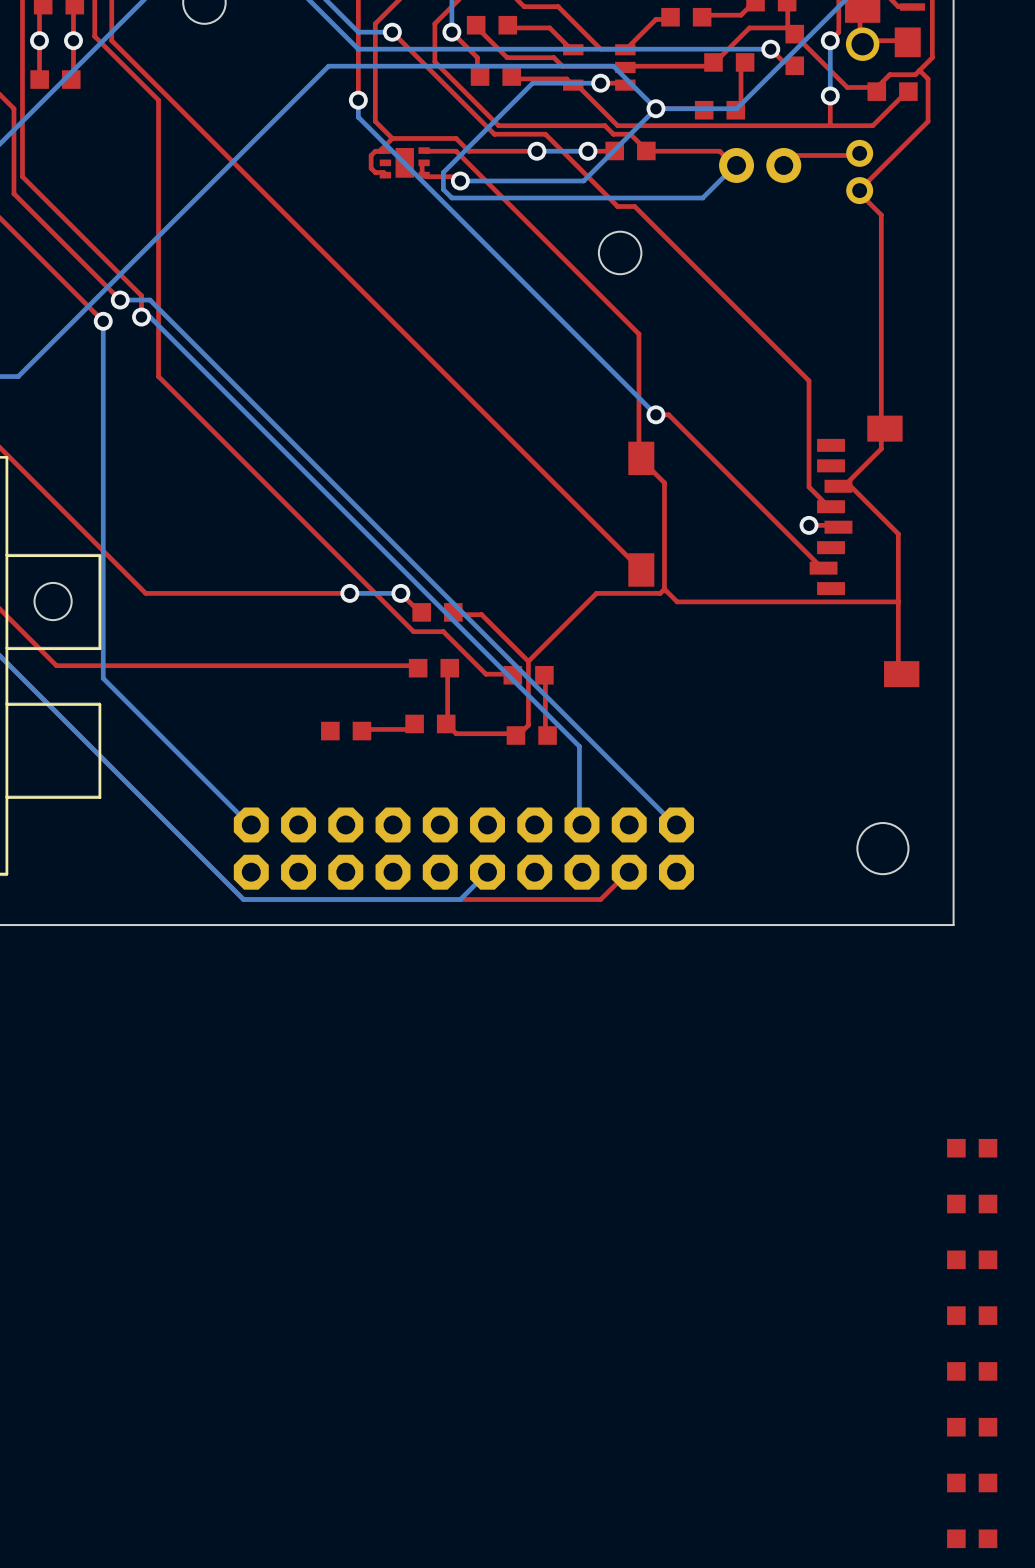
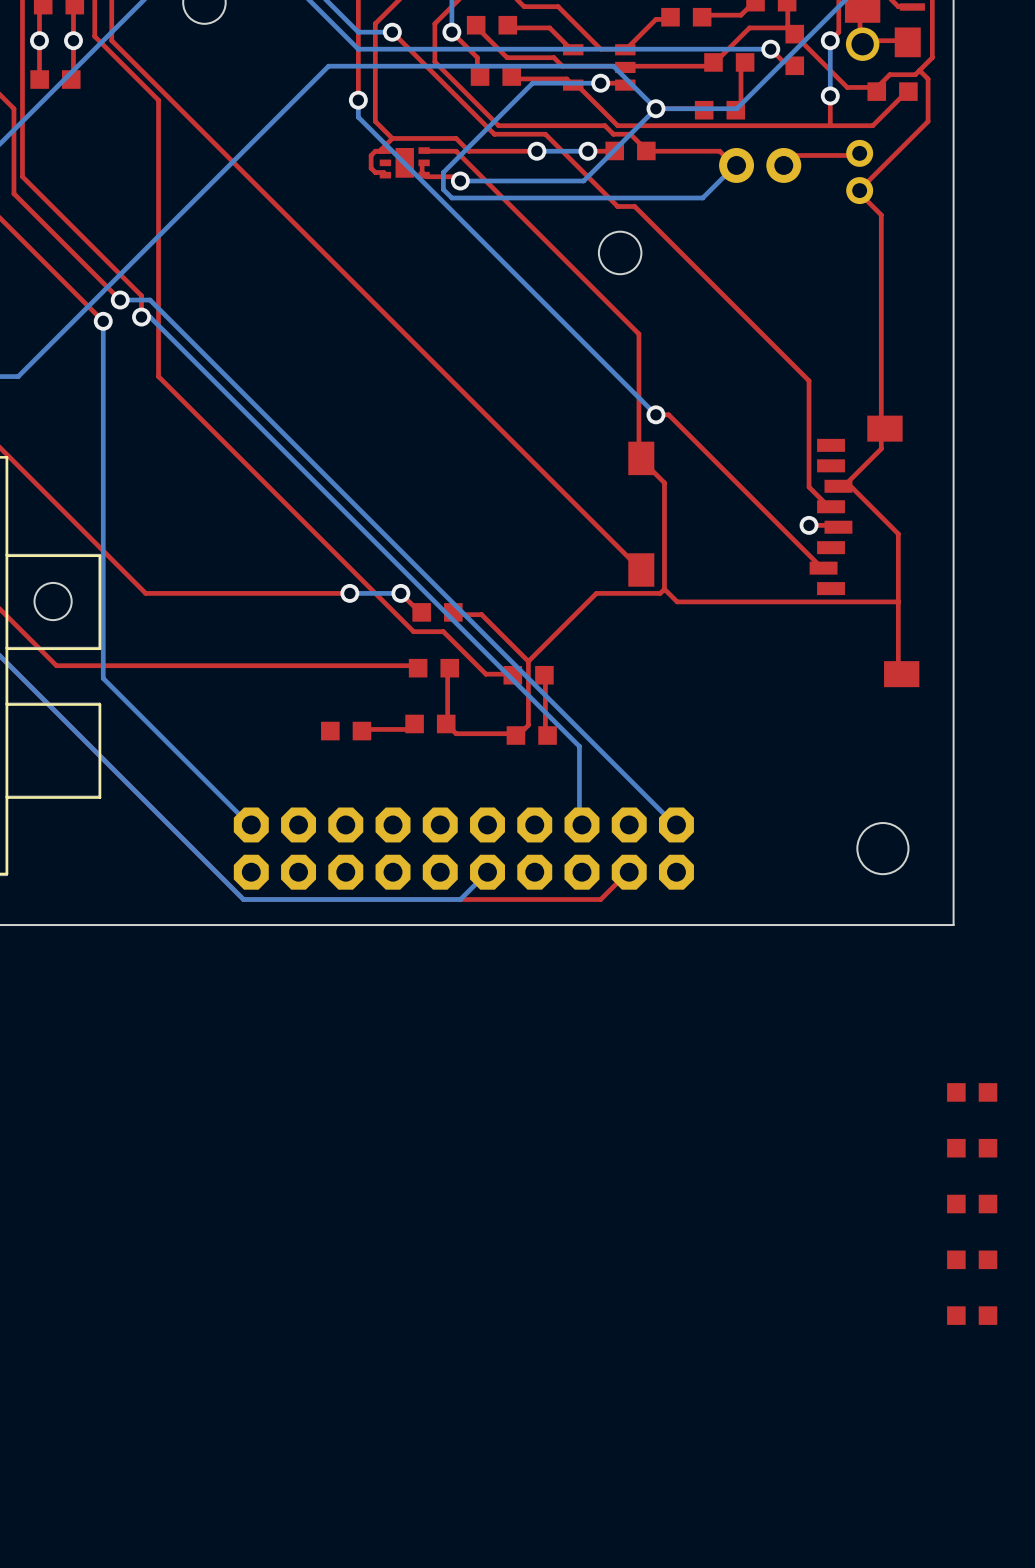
part: none -> (972, 1092)
part: (972, 1371) -> none
part: (972, 1427) -> none
part: (972, 1482) -> none
part: (972, 1538) -> none

